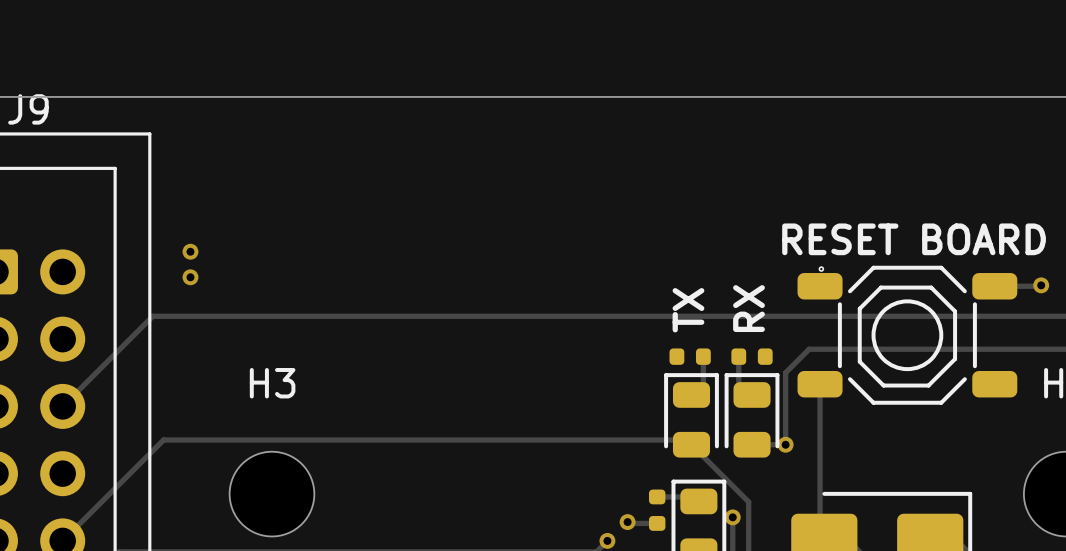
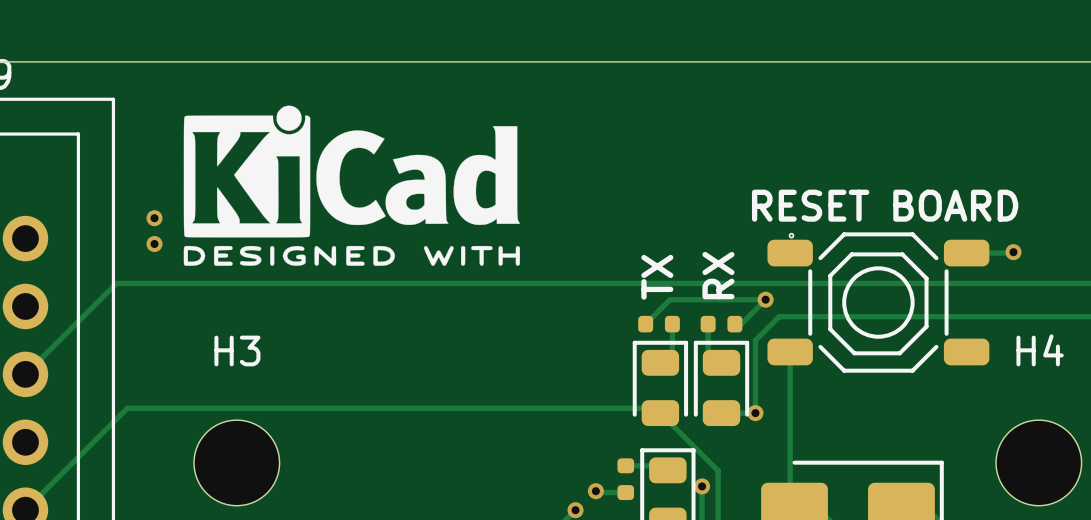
drawing: none -> [183, 105, 520, 266]
via: none -> (765, 299)
track: none -> (645, 324) (670, 299) (765, 299) (741, 324) (734, 324)

